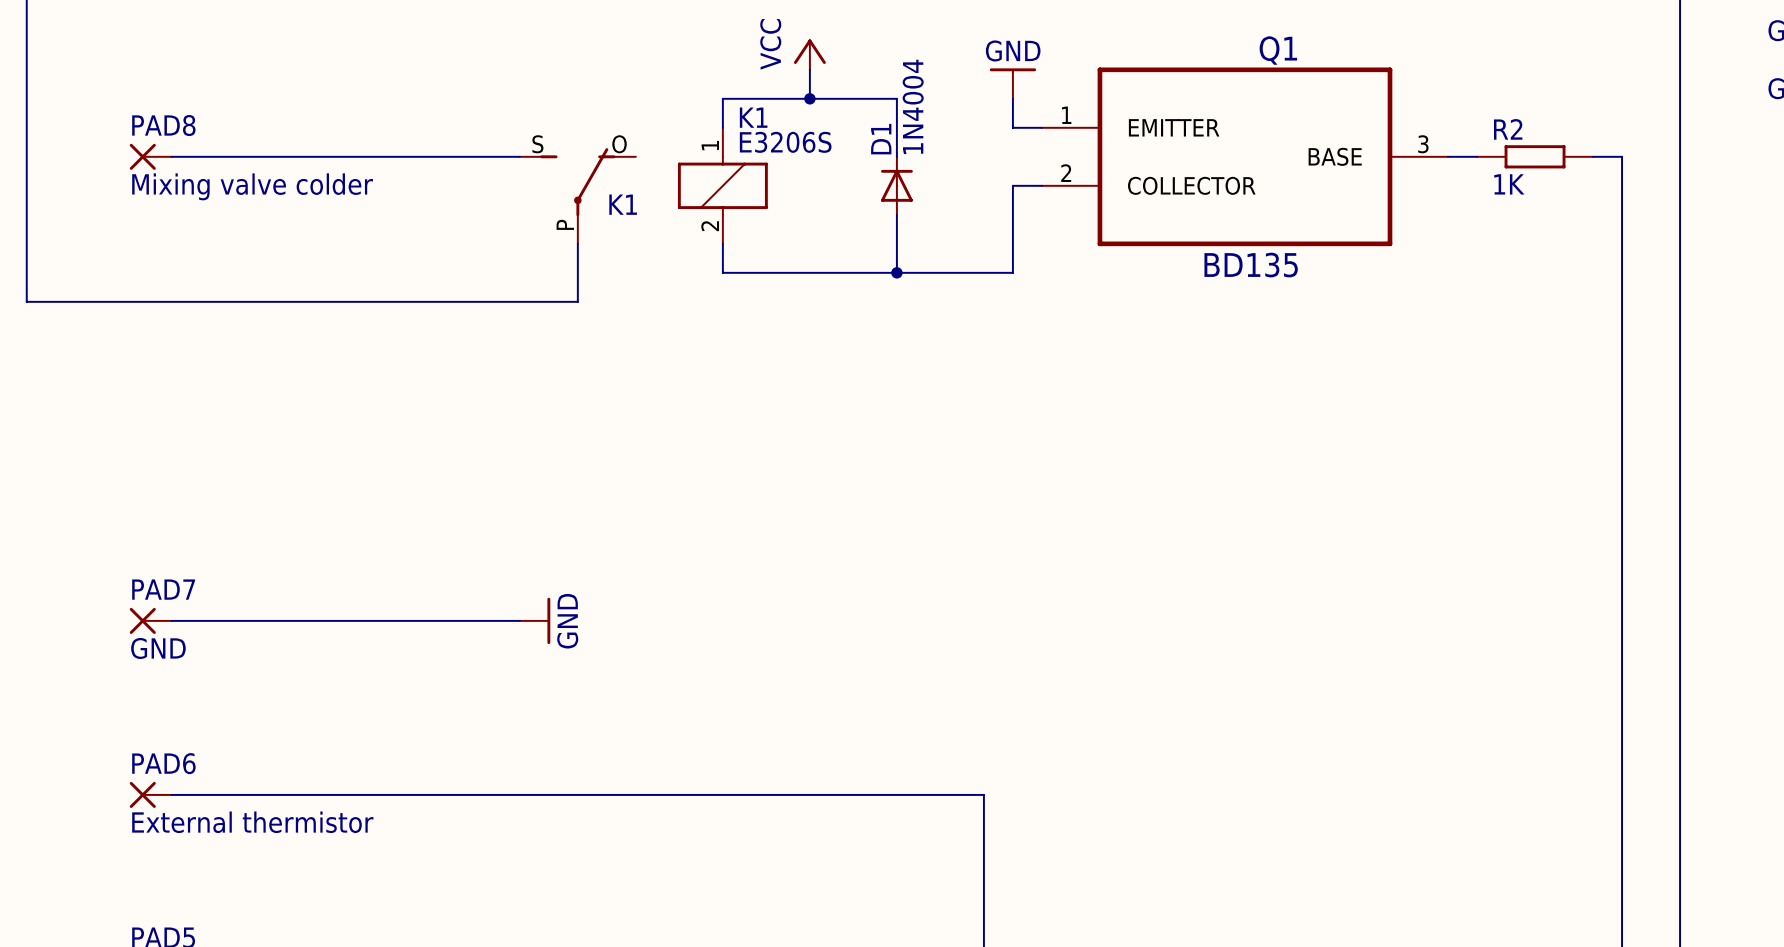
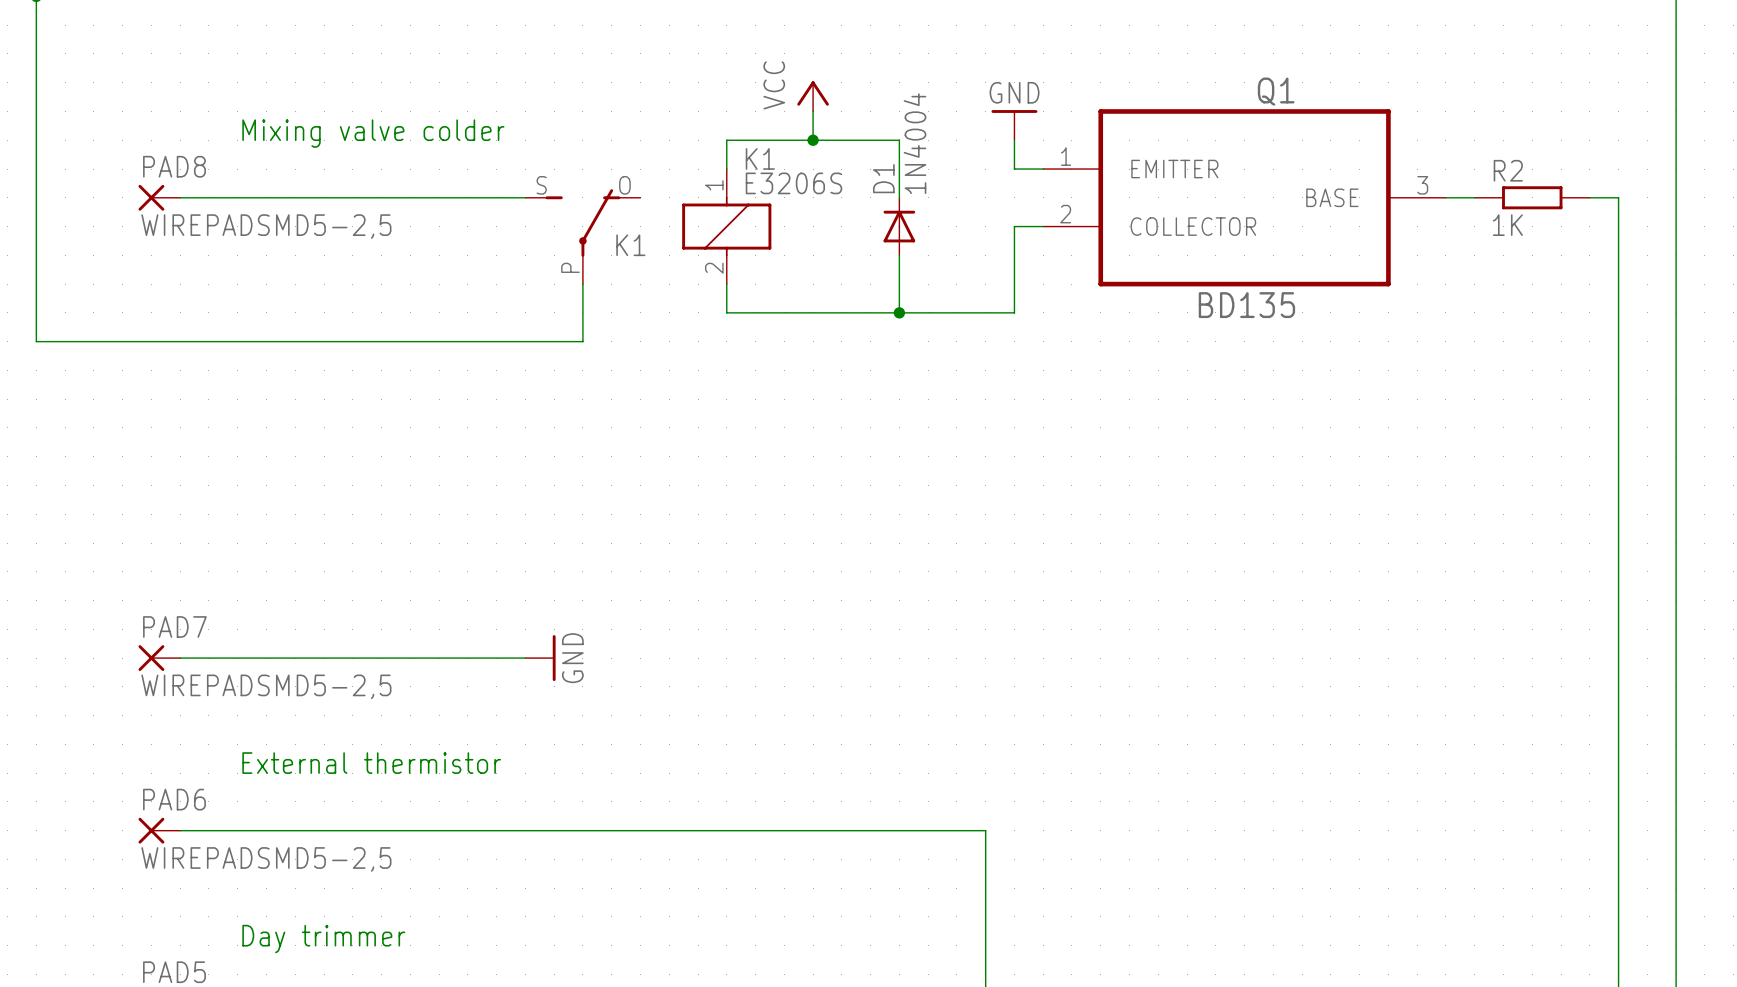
text: none -> Mixing valve colder (373, 133)
PAD8 value: Mixing valve colder (252, 186) -> WIREPADSMD5-2,5 (266, 226)
PAD7 value: GND (158, 648) -> WIREPADSMD5-2,5 (266, 686)
text: none -> External thermistor (371, 763)
PAD6 value: External thermistor (252, 822) -> WIREPADSMD5-2,5 (266, 859)
text: none -> Day trimmer (323, 939)

